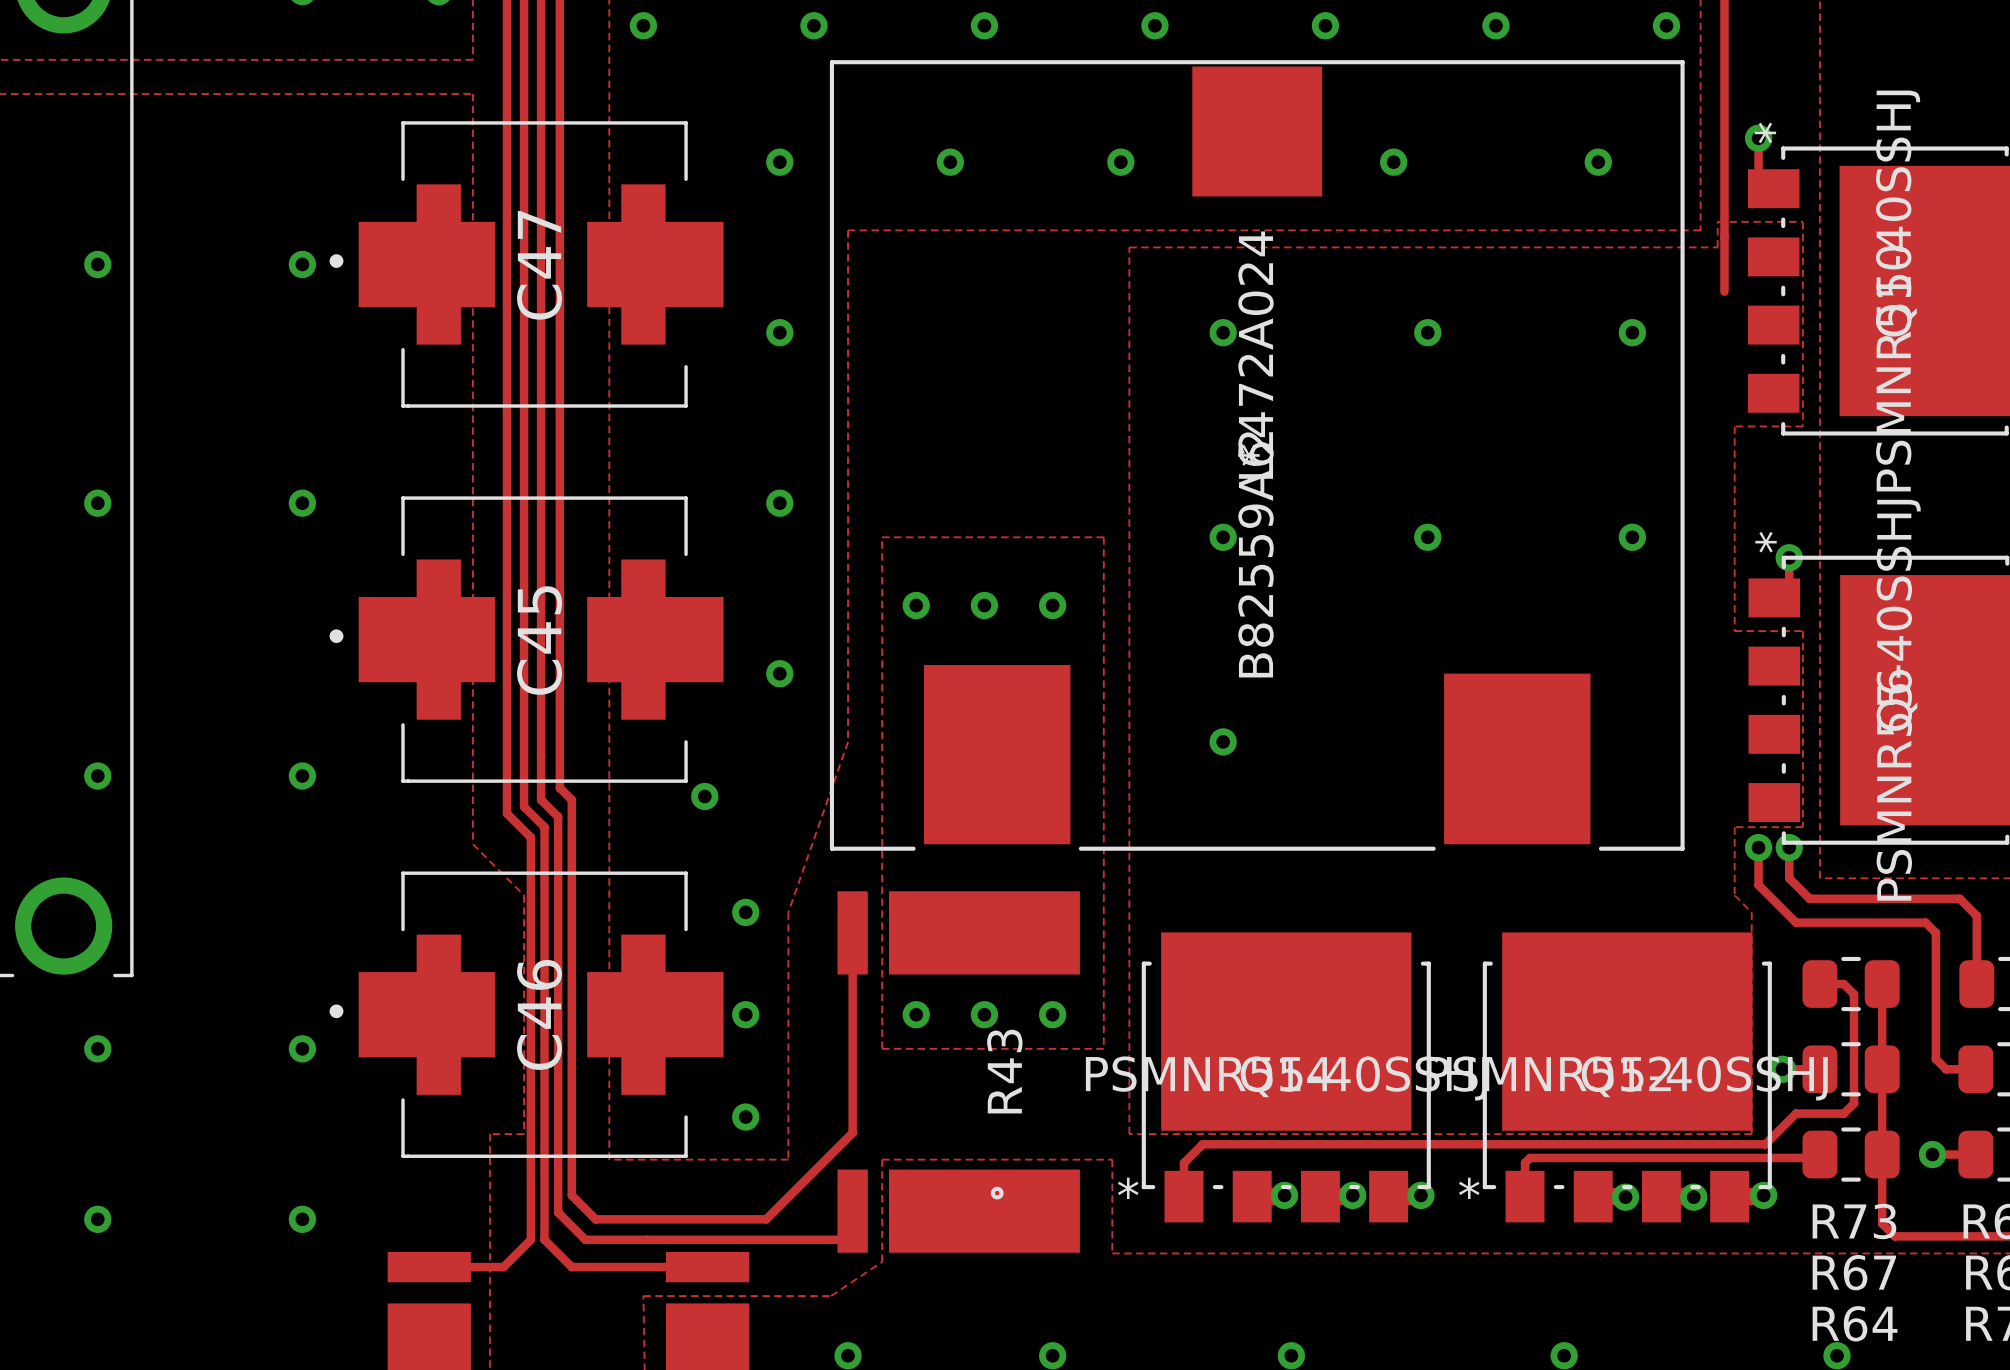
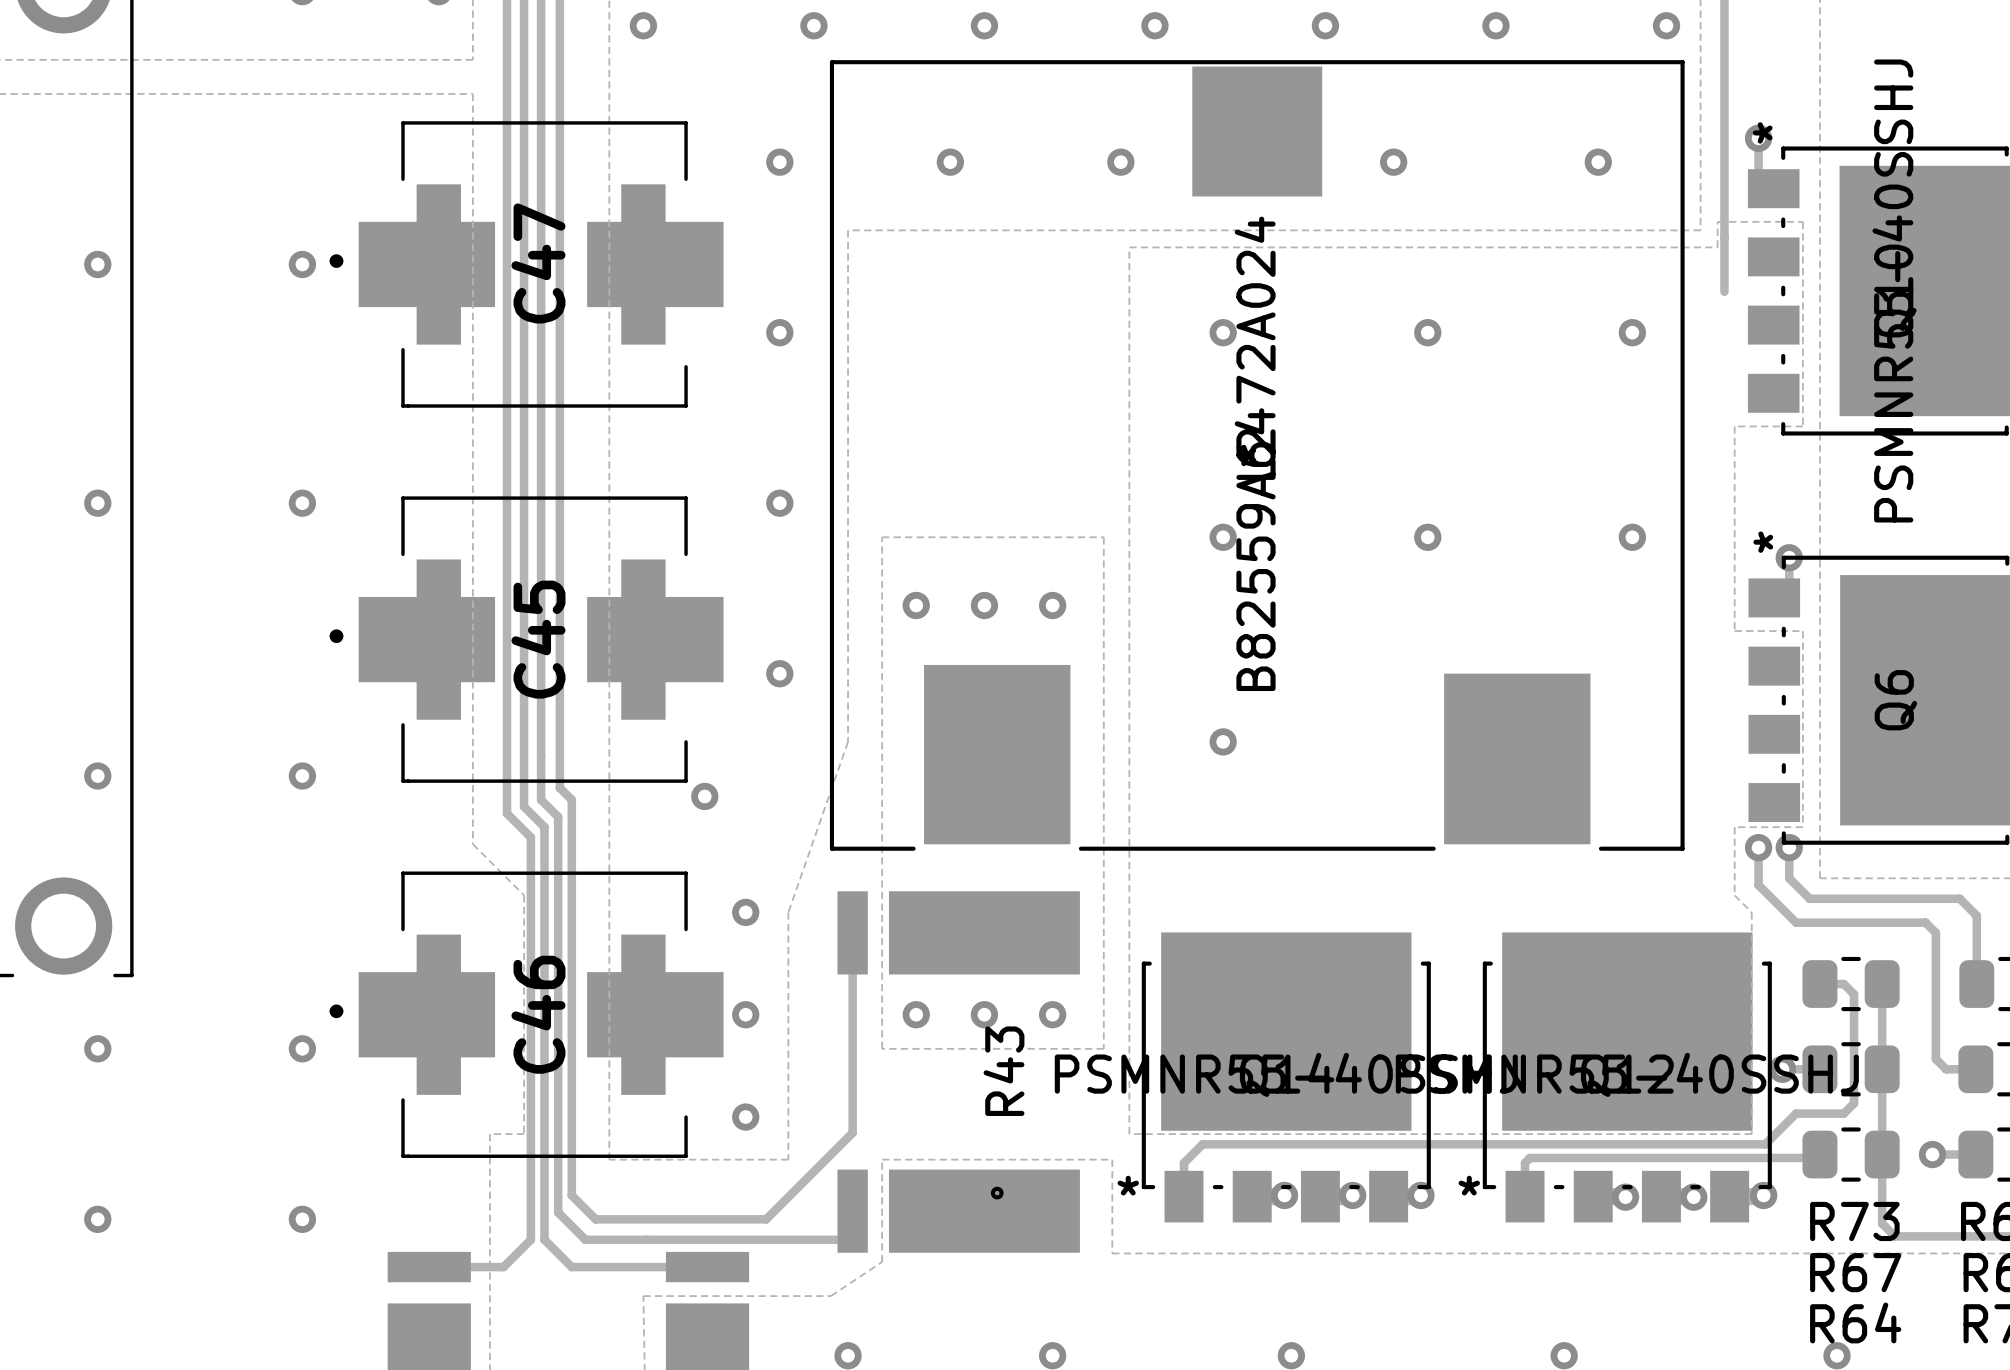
Q6 value: PSMNR55-40SSHJ (1898, 700) -> none

